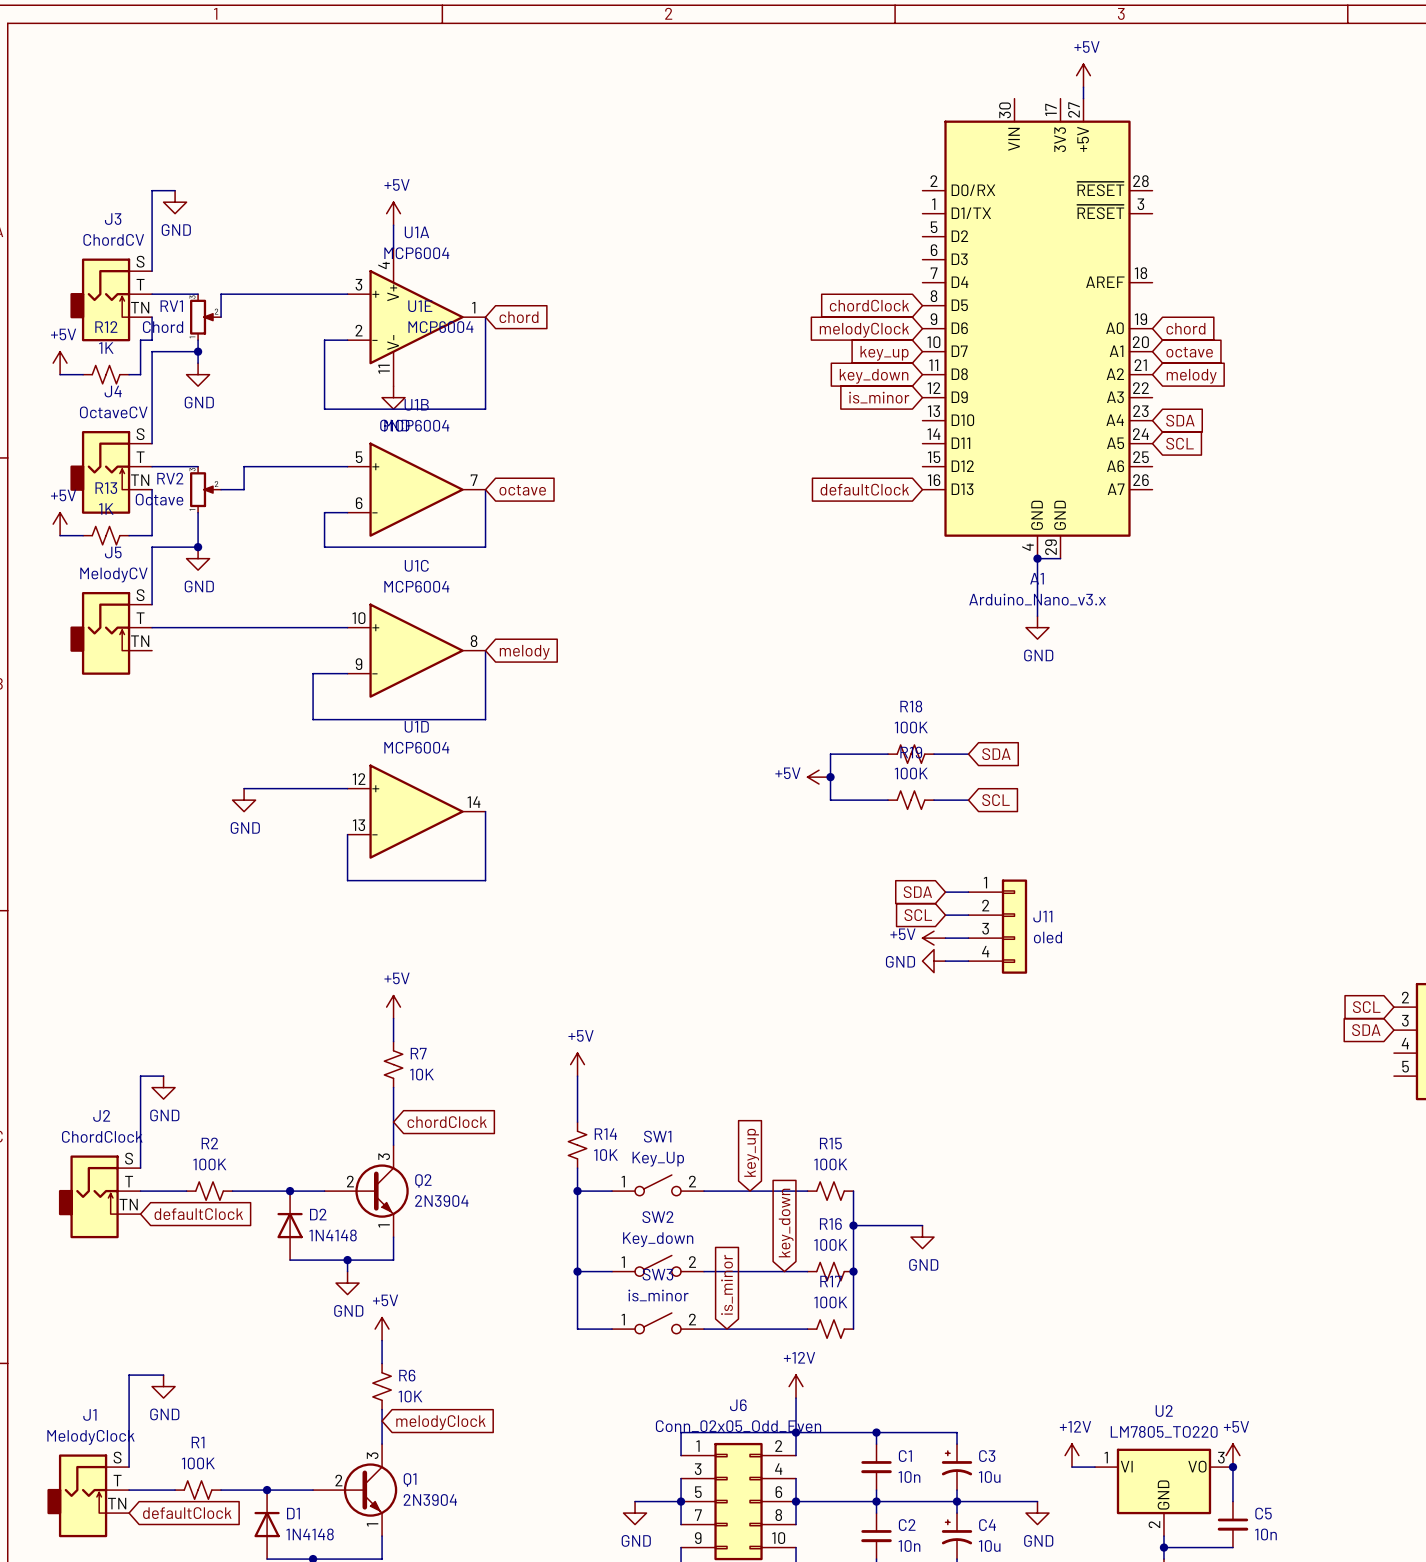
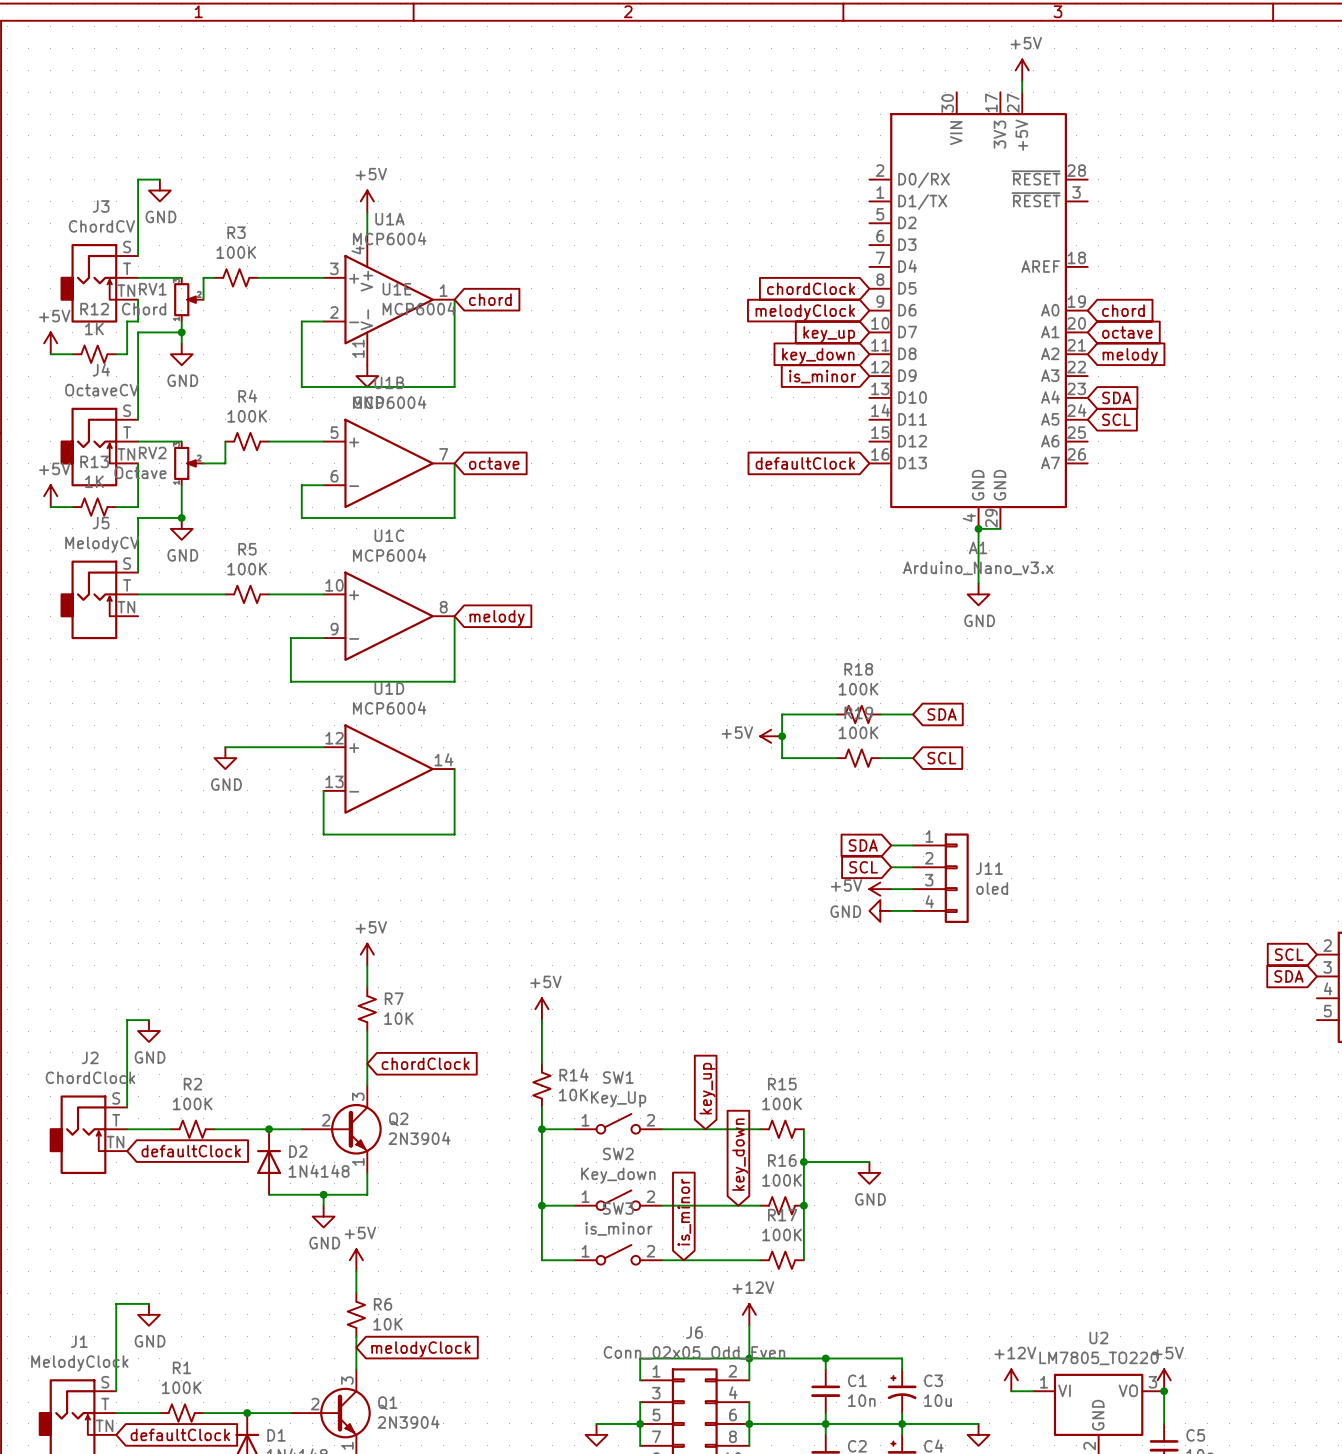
R3: none -> 100K (236, 277)
R4: none -> 100K (247, 441)
R5: none -> 100K (247, 594)

